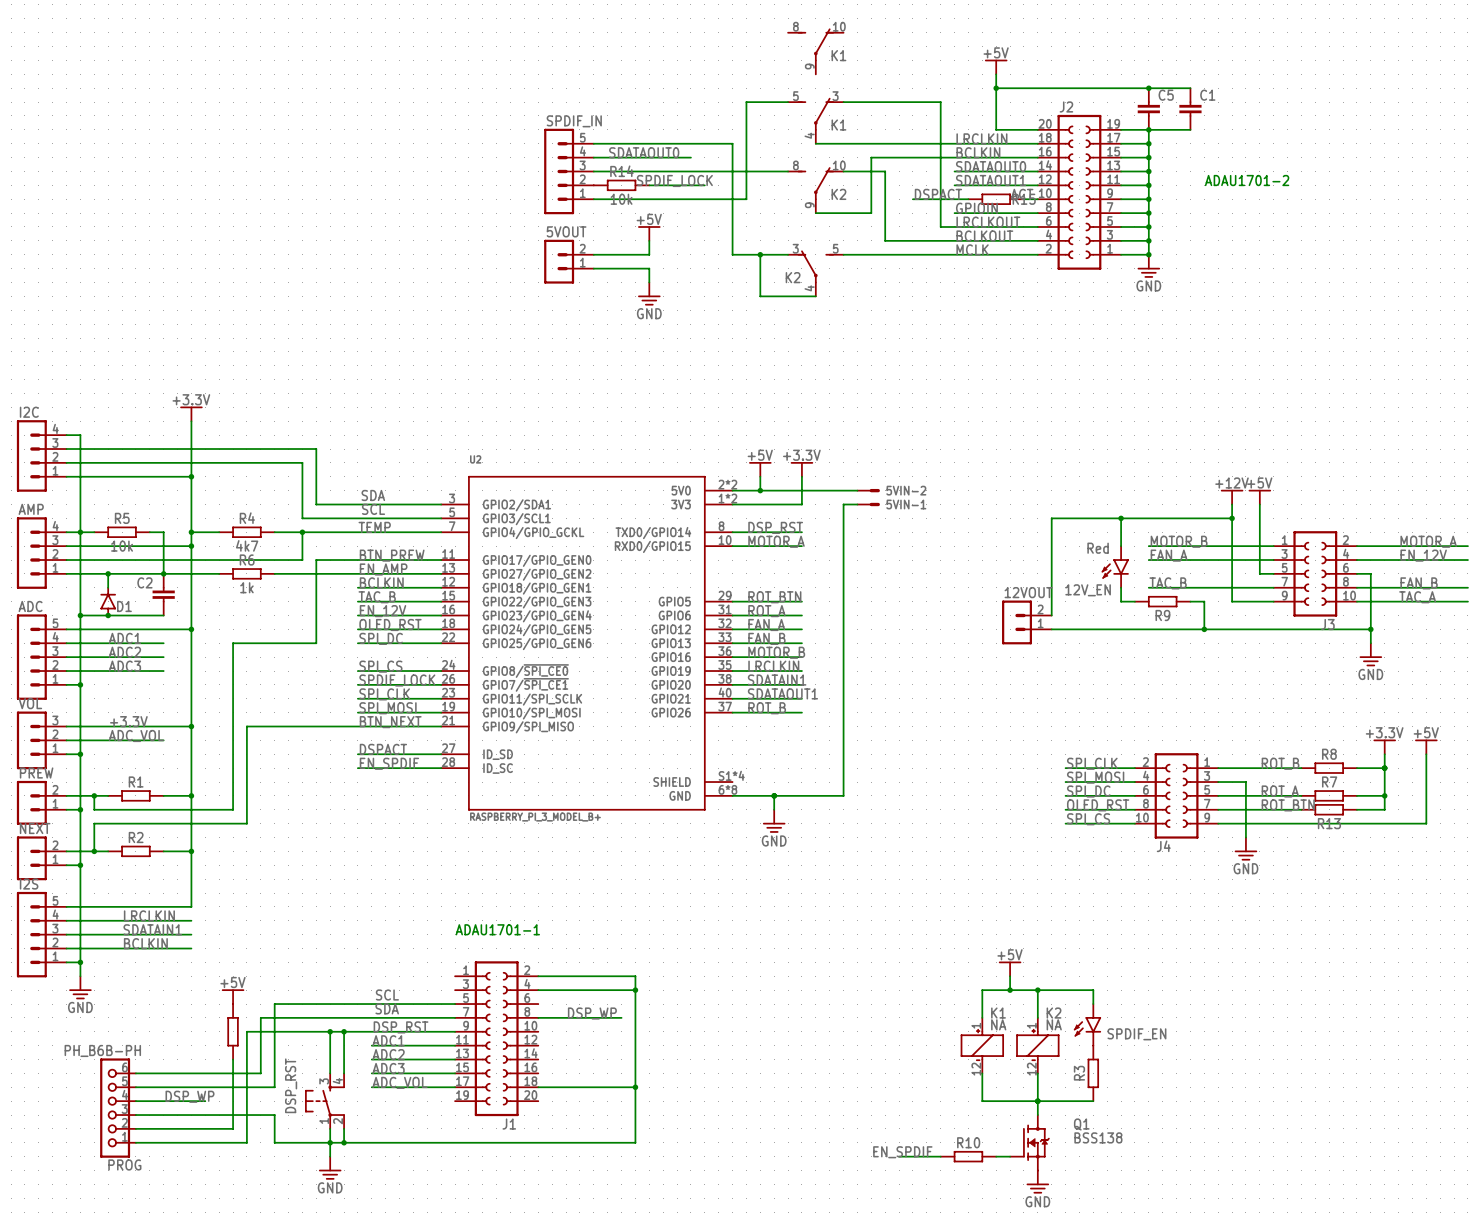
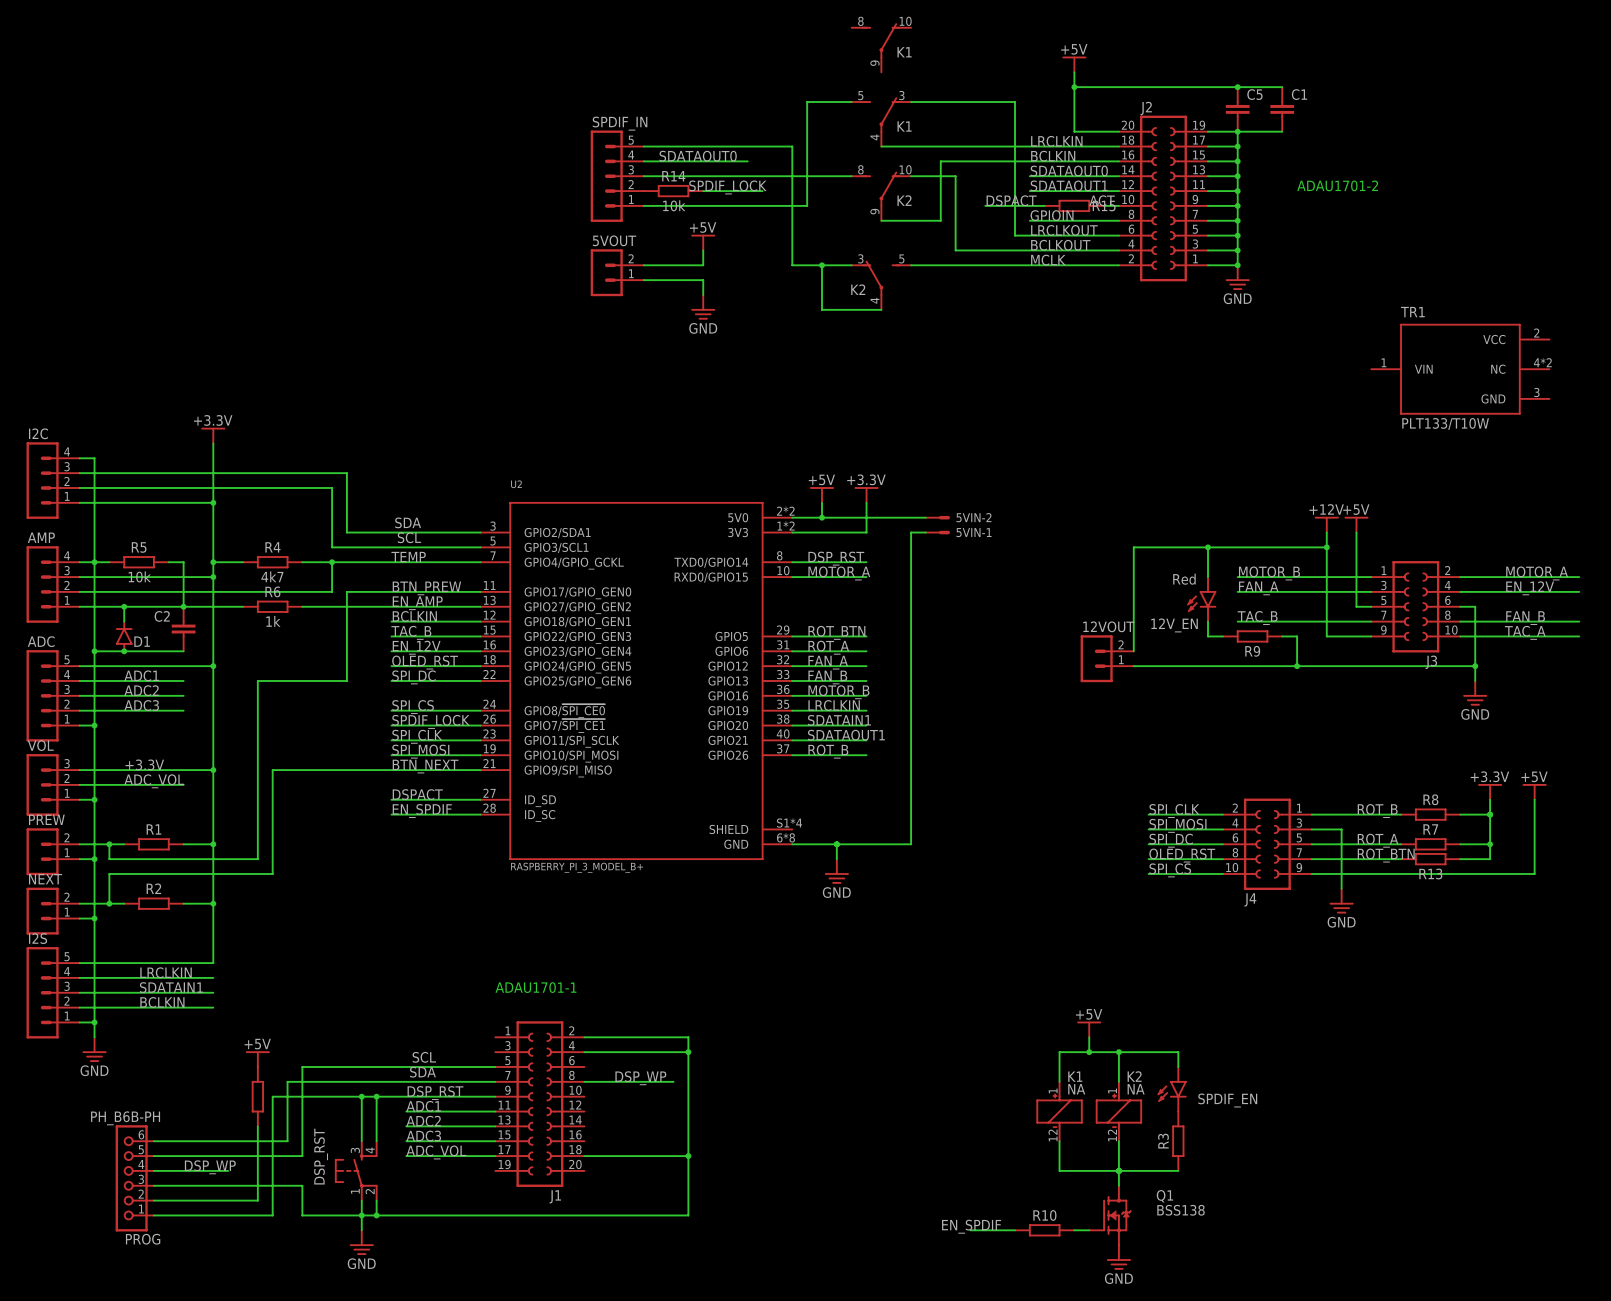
TR1: none -> PLT133/T10W (1460, 369)

